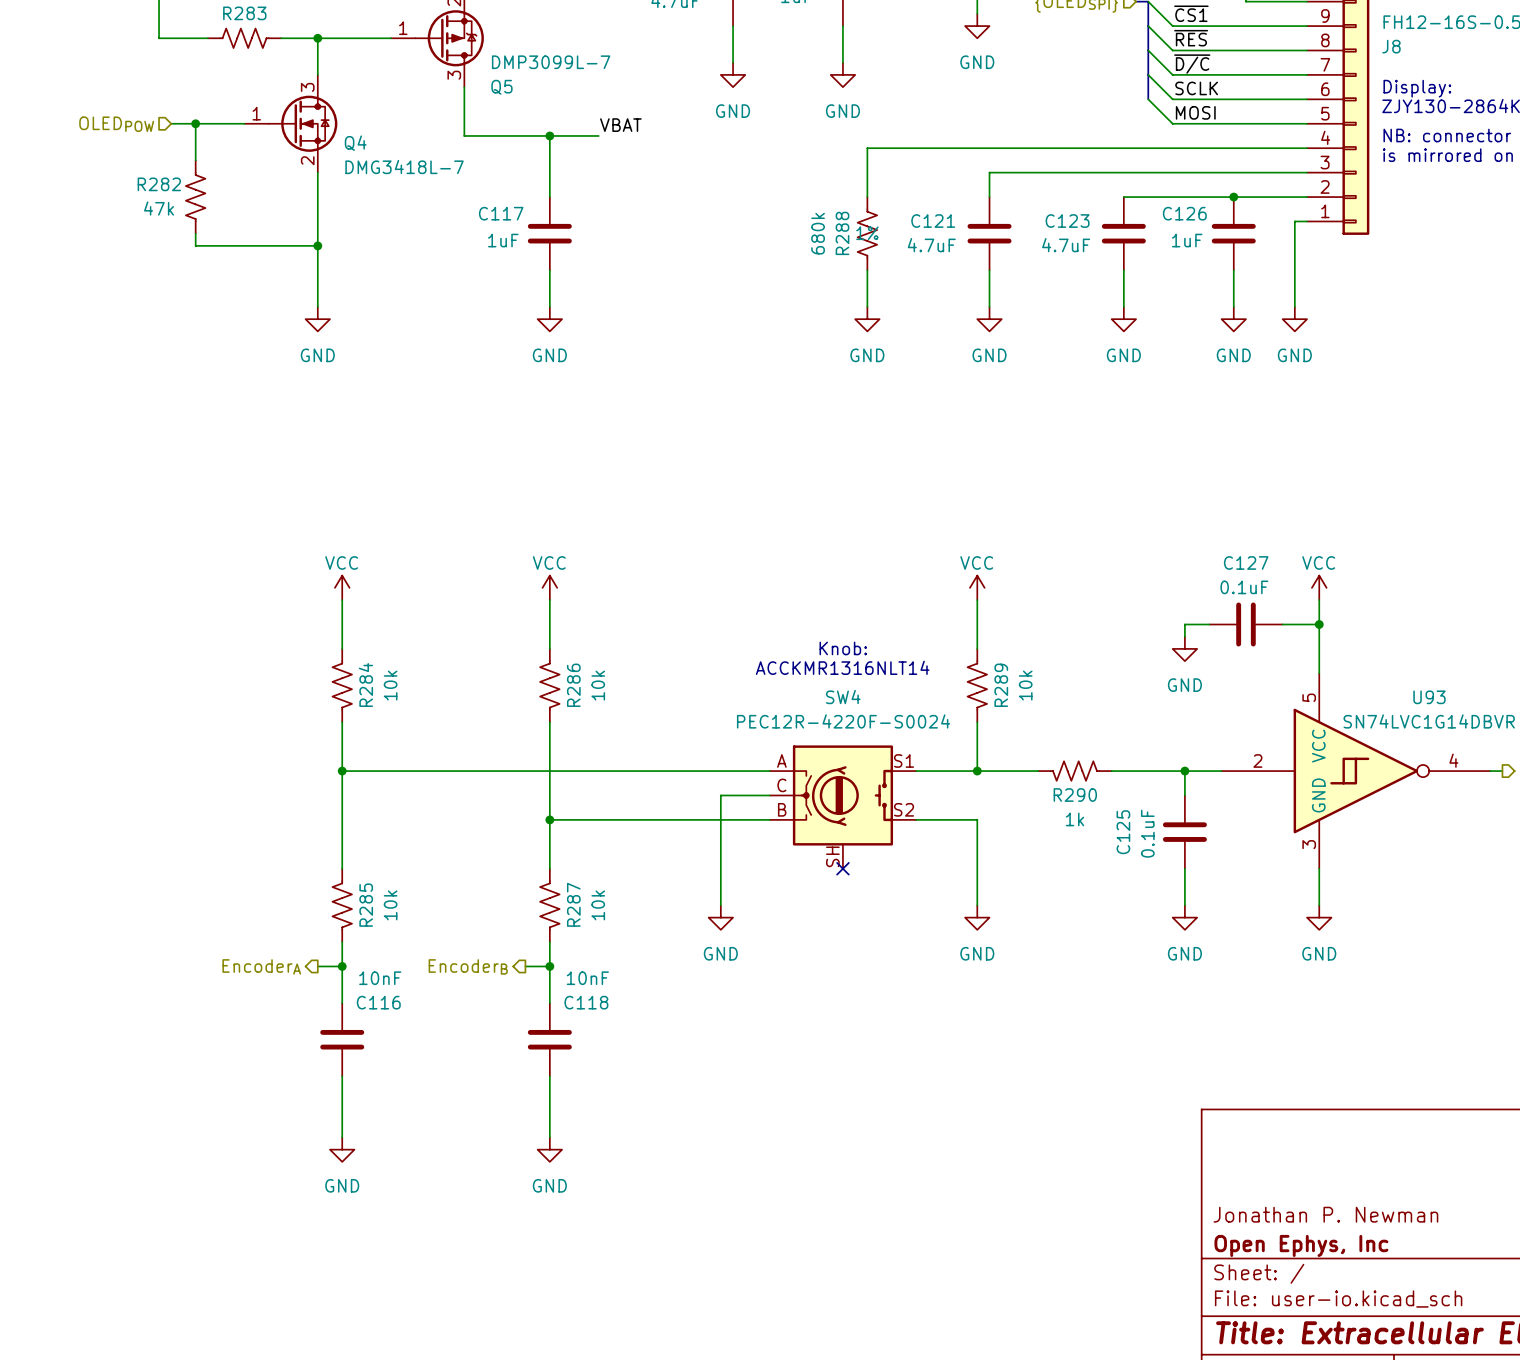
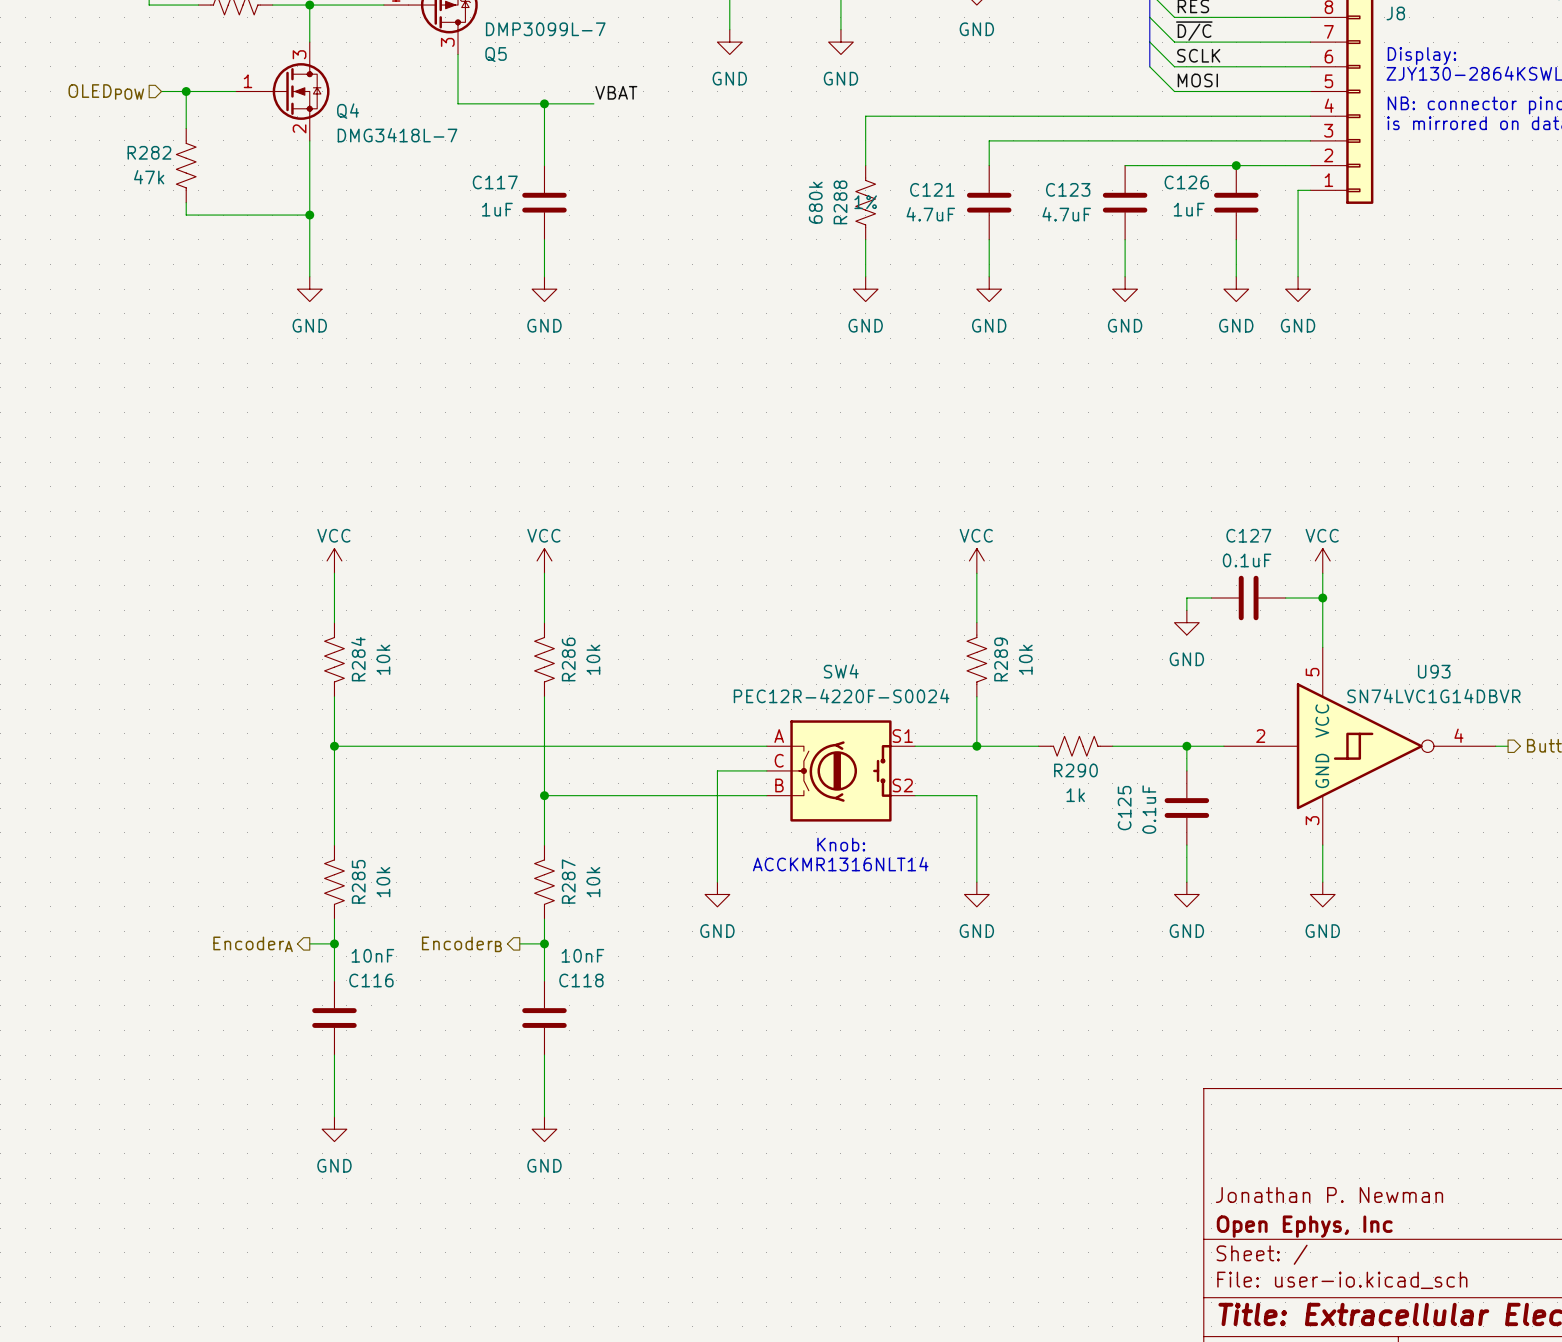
text position: Knob: (843, 648) -> Knob: (841, 844)
text position: ACCKMR1316NLT14 (842, 667) -> ACCKMR1316NLT14 (840, 864)
SW4 symbol: [769, 745, 917, 869] -> [766, 720, 916, 822]
no-connect mark: (842, 868) -> none

